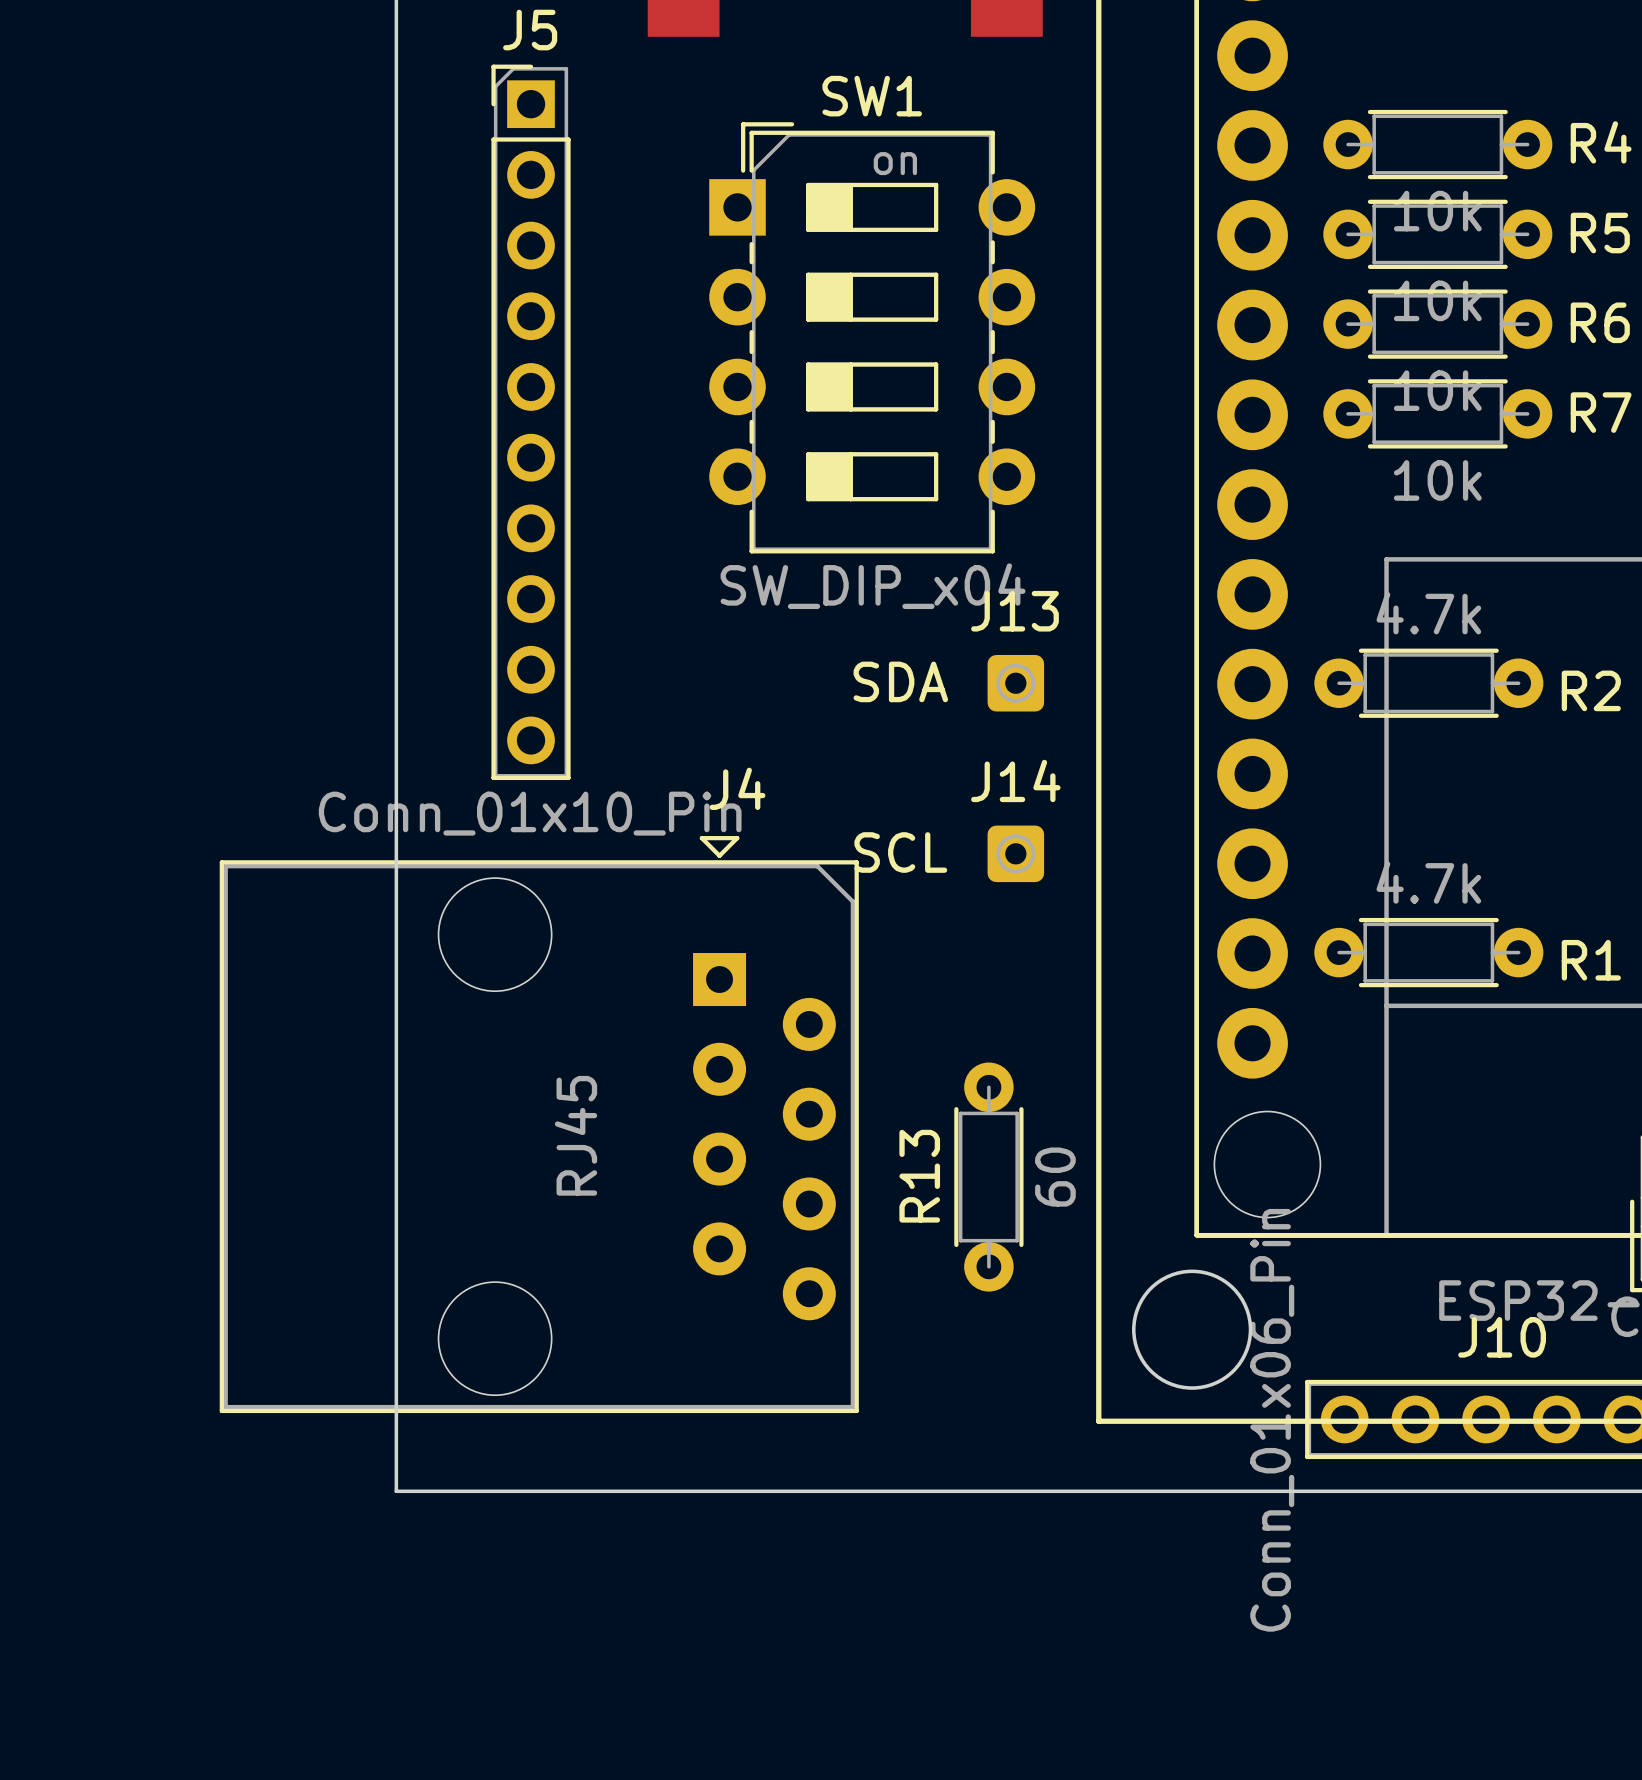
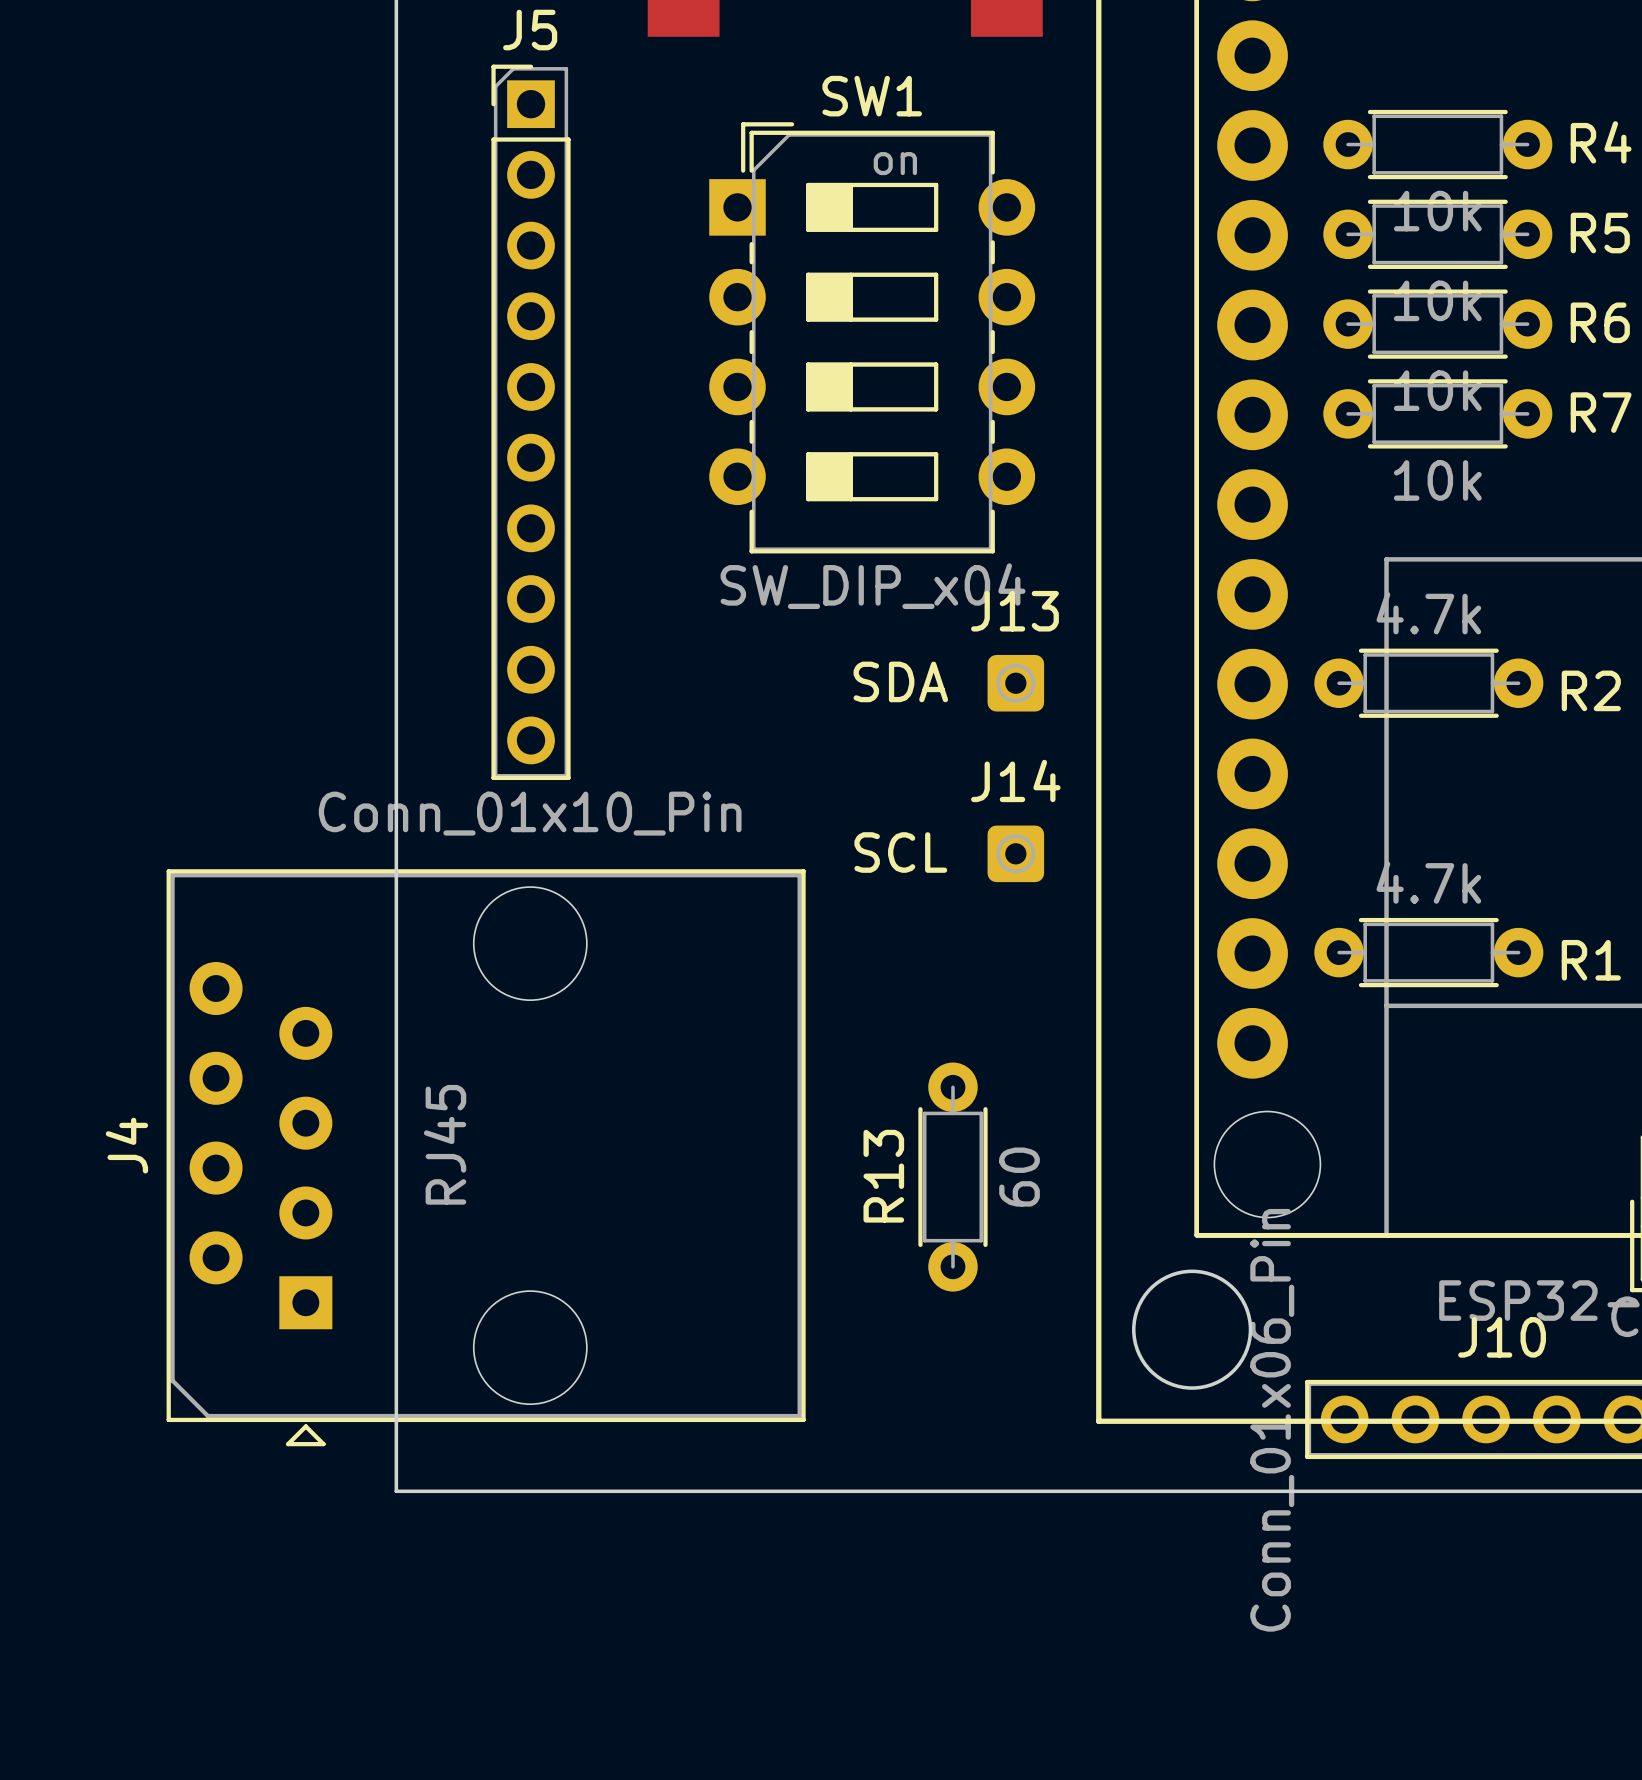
J4 name position: J4 (737, 788) -> J4 (126, 1145)
J4 rotation: 0° (539, 1124) -> 180° (486, 1157)
R13 position: (988, 1177) -> (952, 1177)

